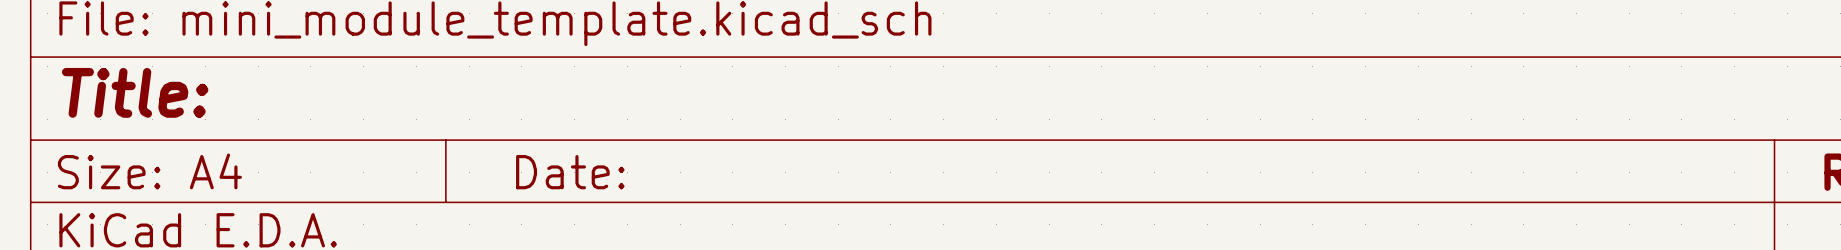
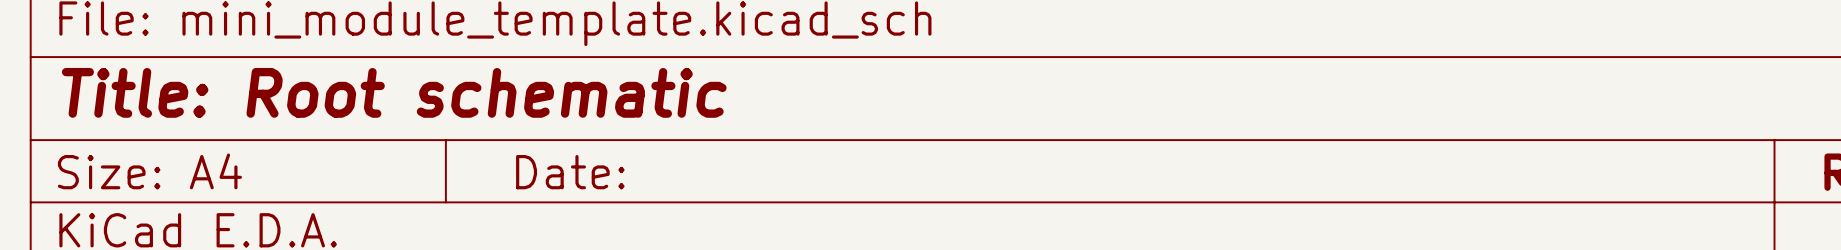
title block: Title: (135, 92) -> Title: Root schematic (394, 92)

